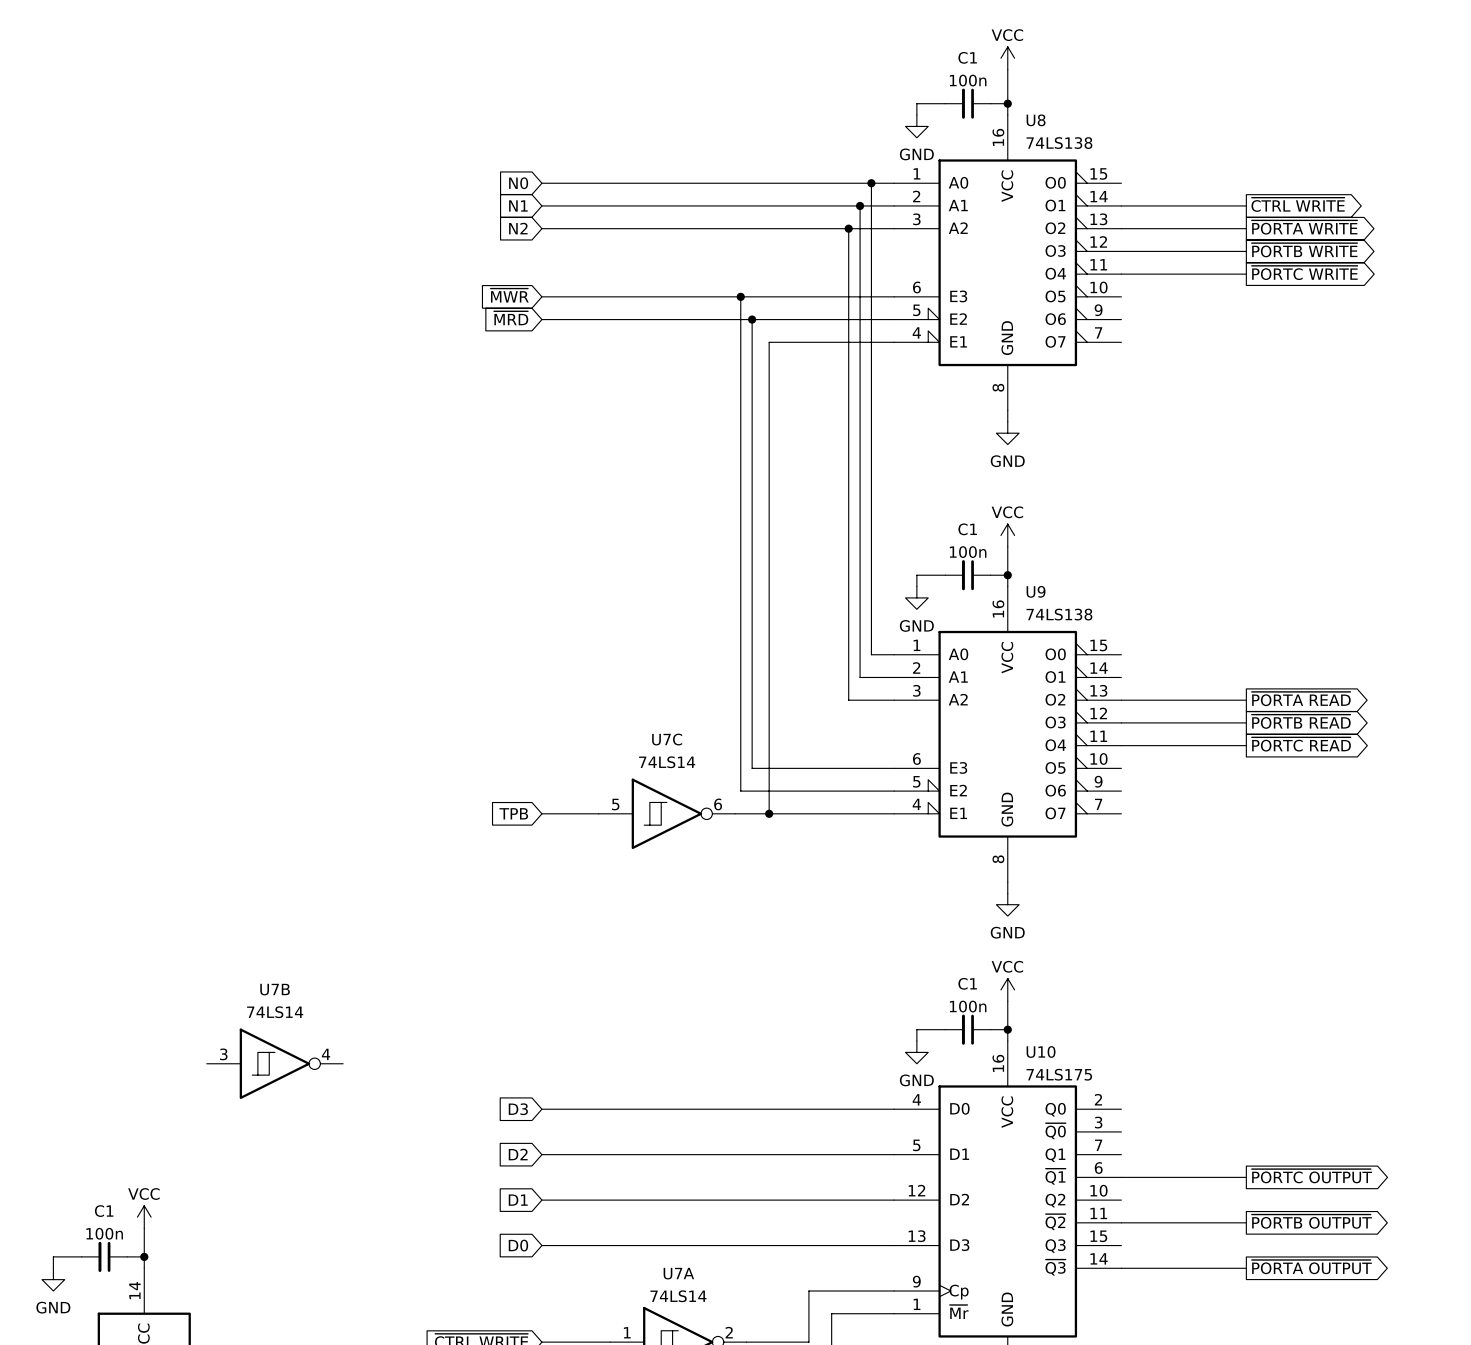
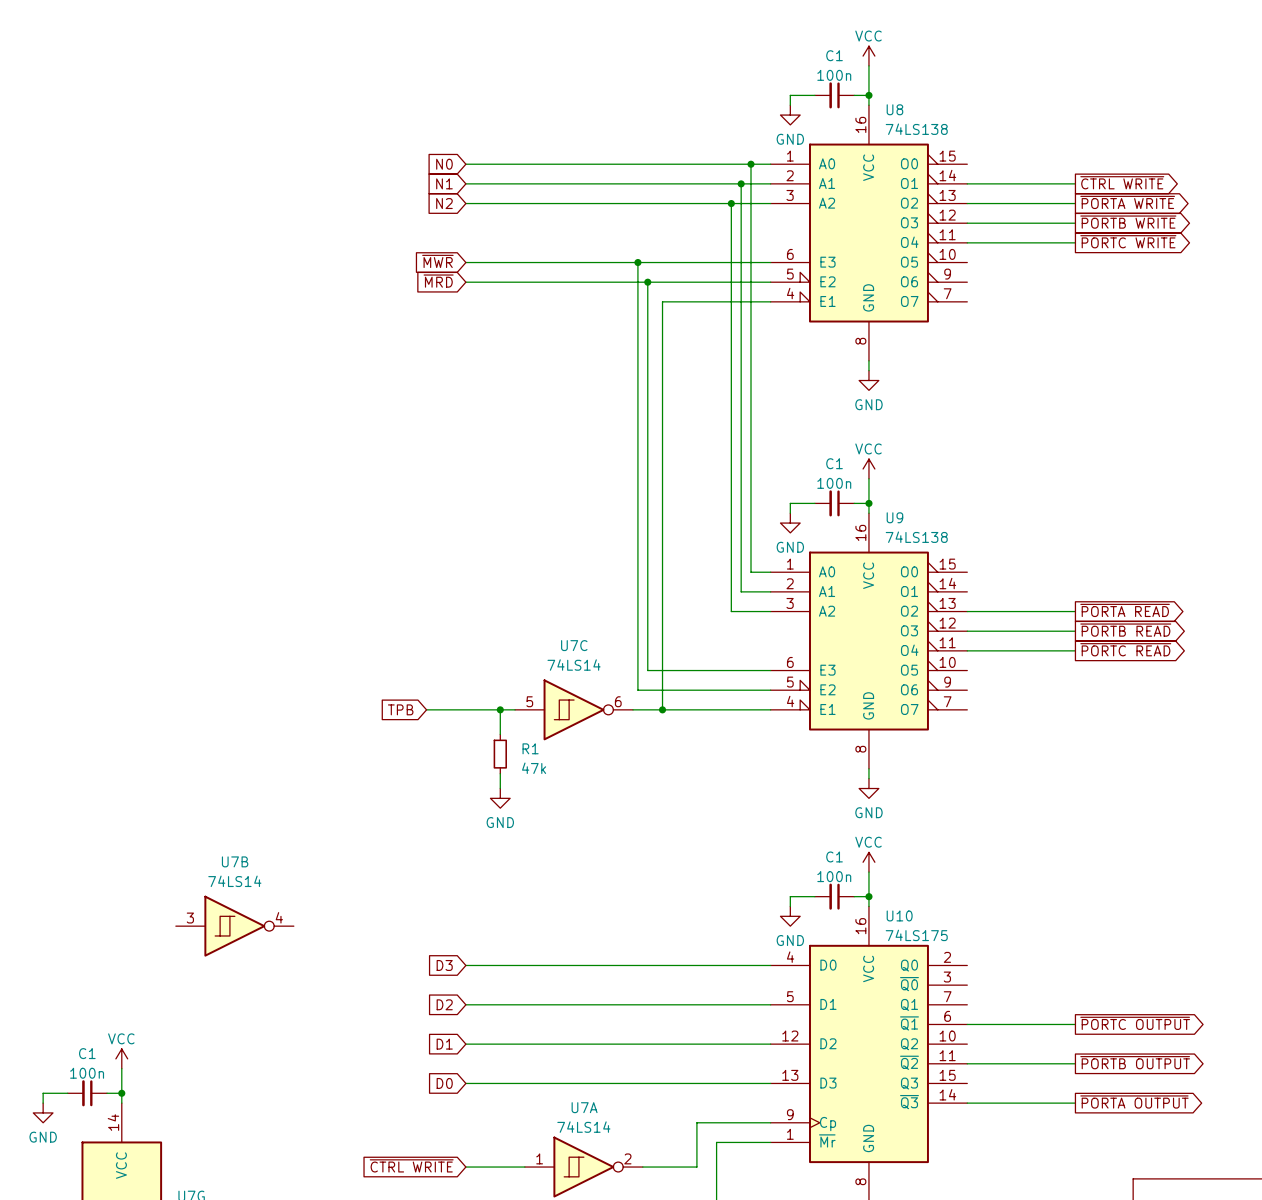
wire: none -> (426, 709) (465, 709)
global label position: TPB (513, 813) -> TPB (400, 709)
wire: none -> (500, 709) (500, 734)
junction: none -> (500, 709)
R1: none -> 47k (500, 754)
wire: none -> (500, 773) (500, 788)
power symbol: none -> GND (500, 798)

